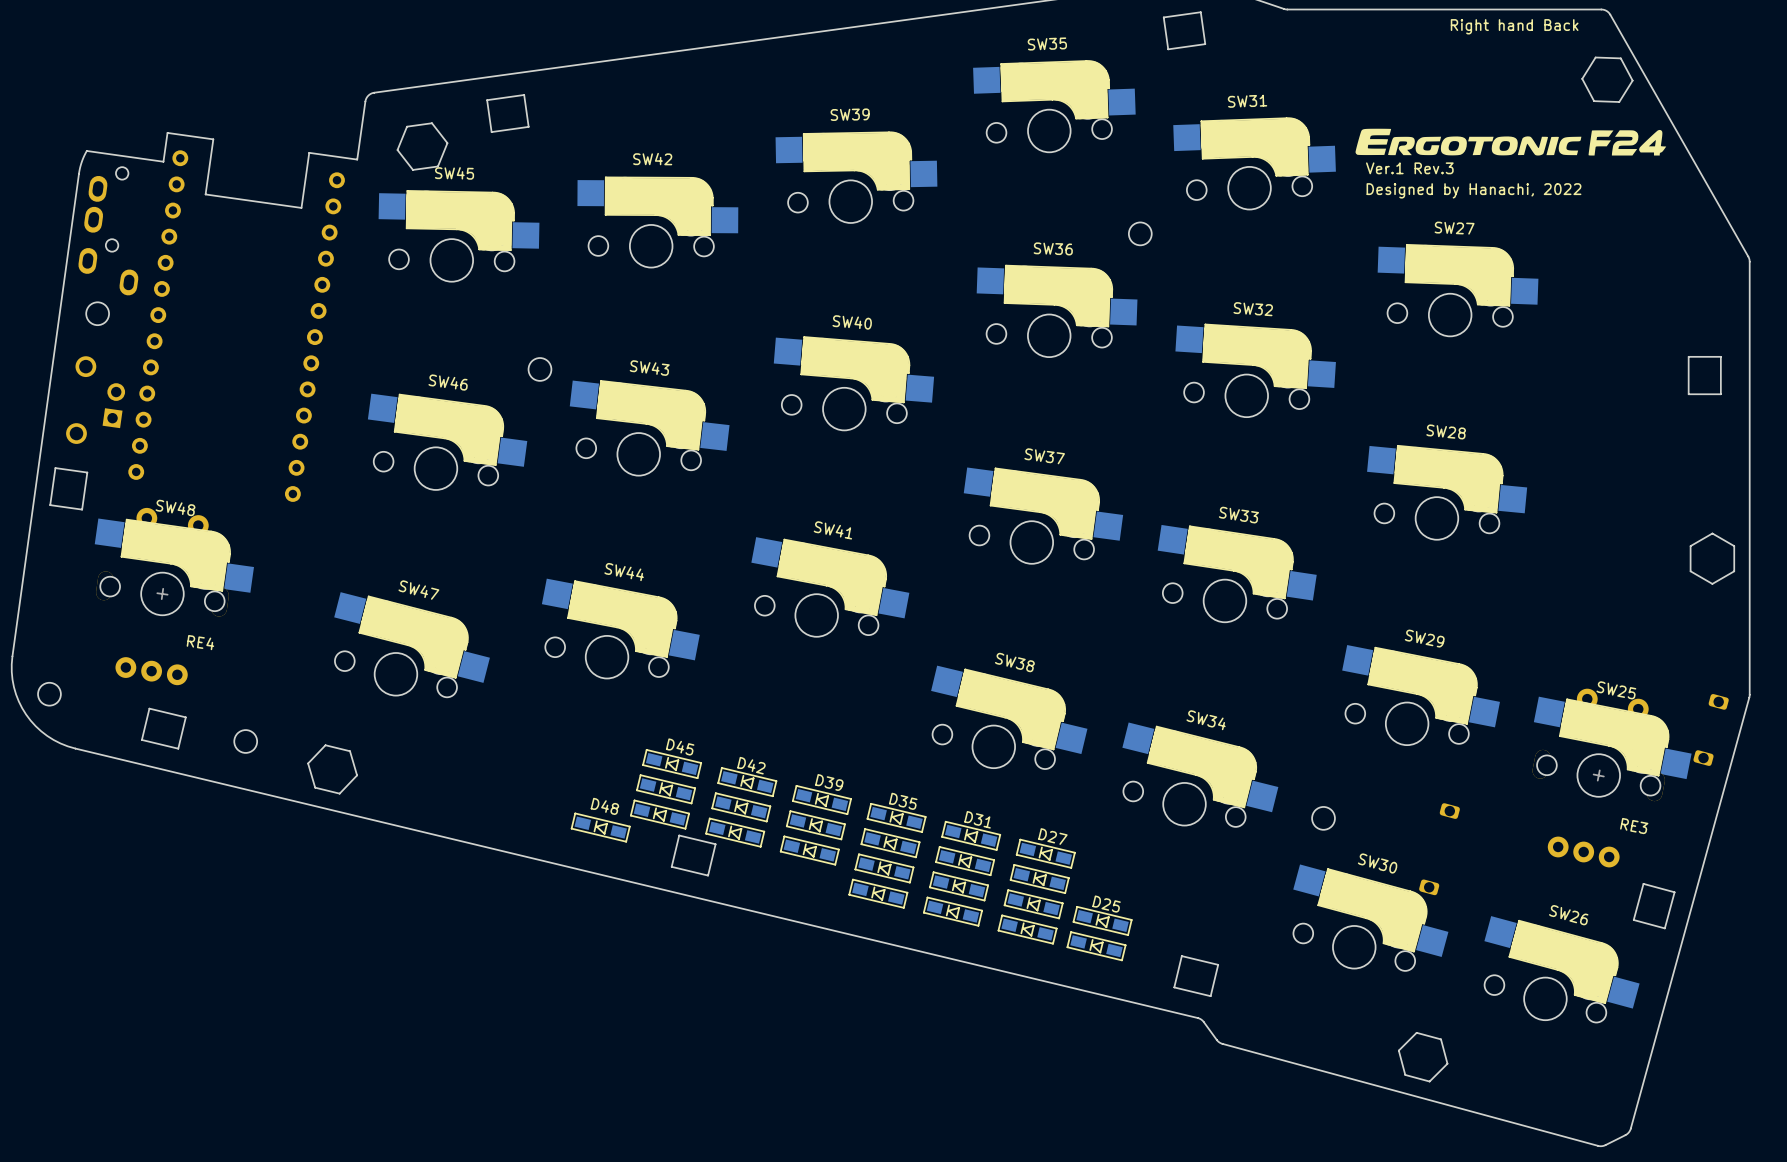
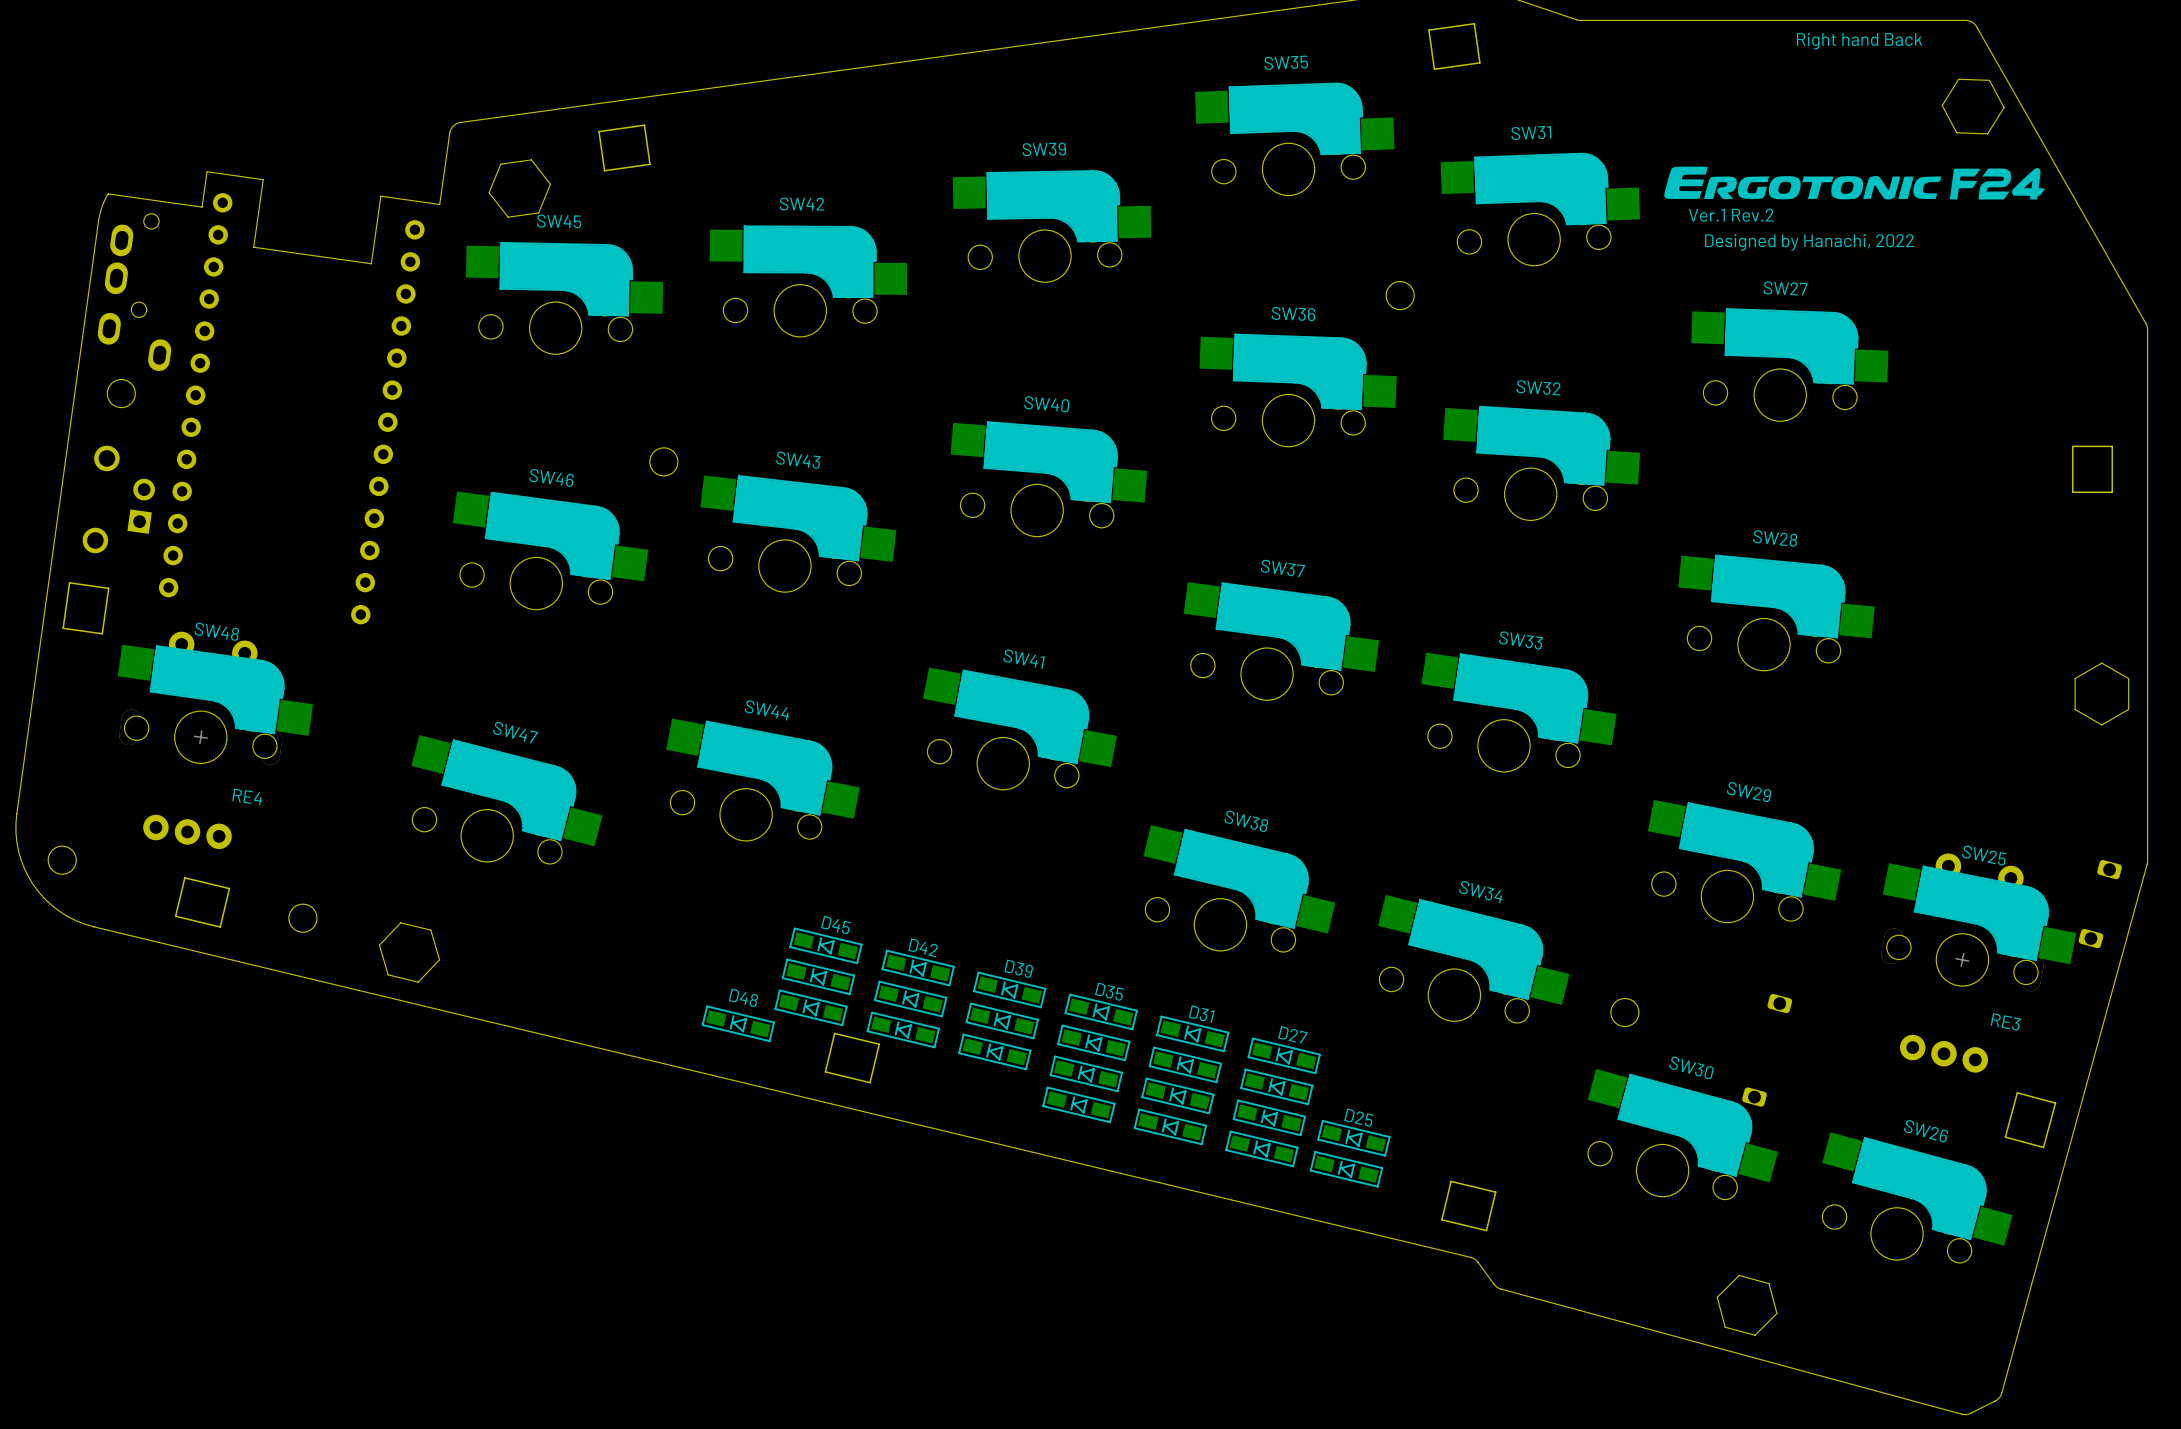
text: Ver.1 Rev.3 (1409, 168) -> Ver.1 Rev.2 (1731, 215)

